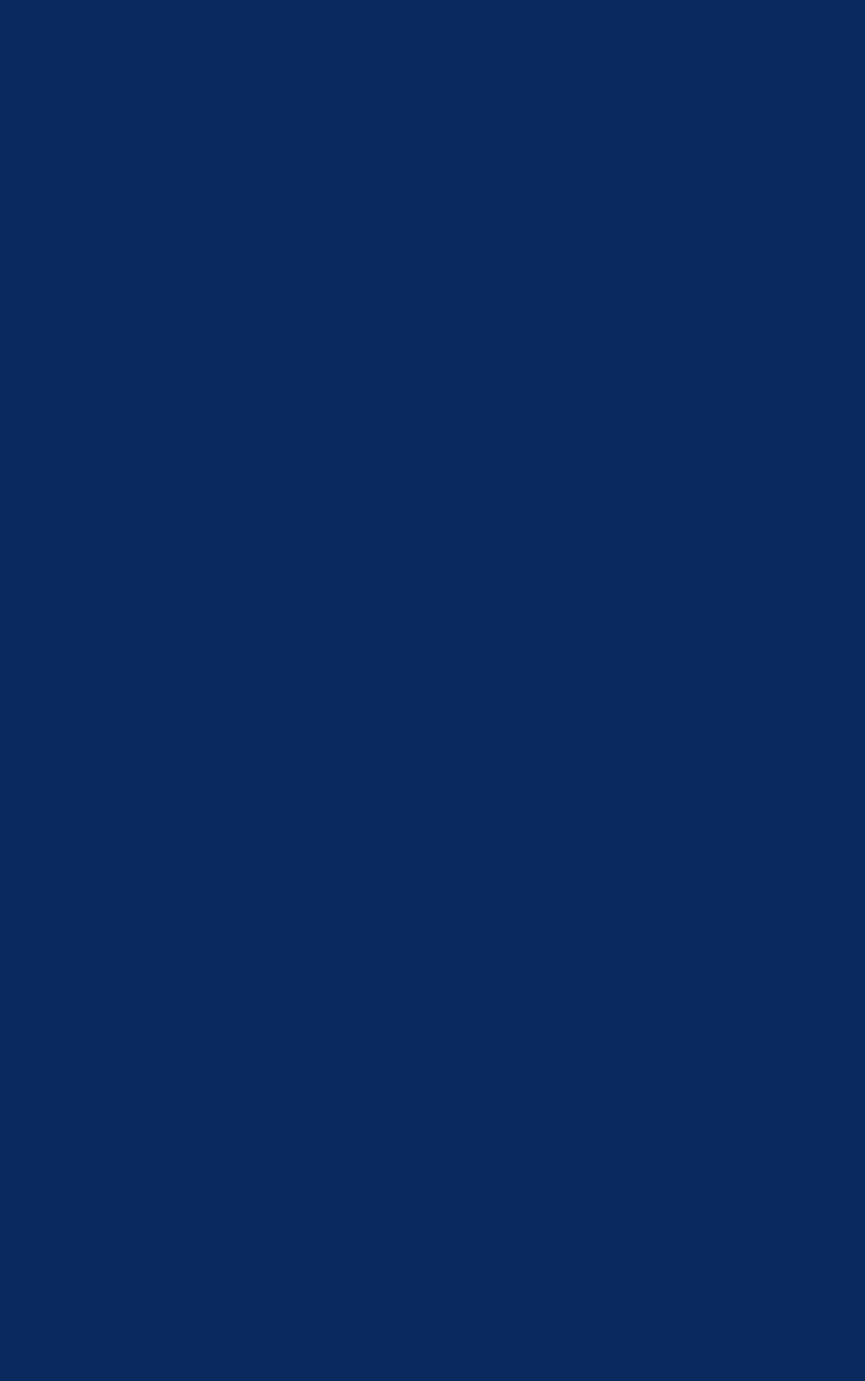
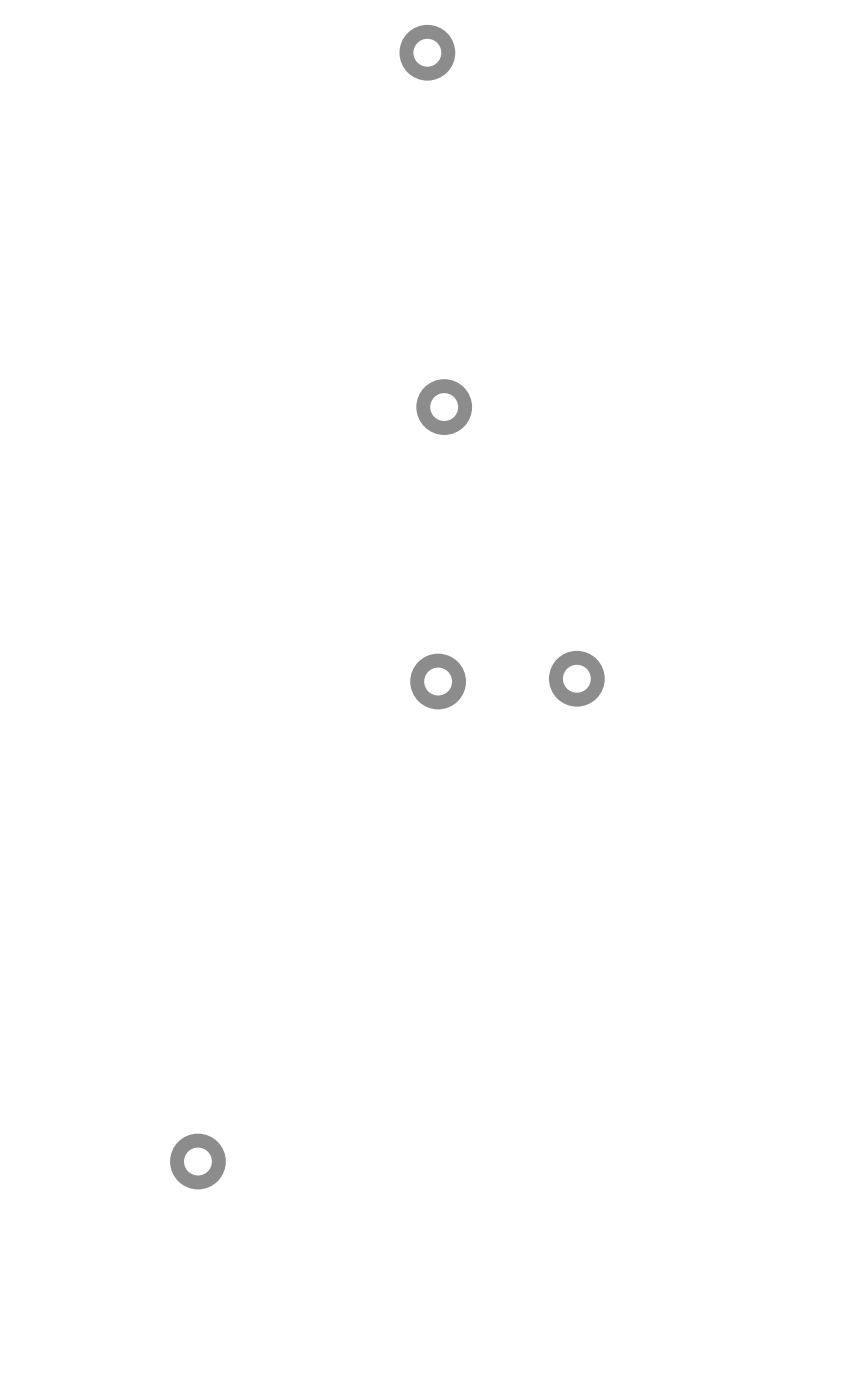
via: none -> (427, 52)
via: none -> (444, 407)
via: none -> (576, 678)
via: none -> (438, 681)
via: none -> (197, 1161)

